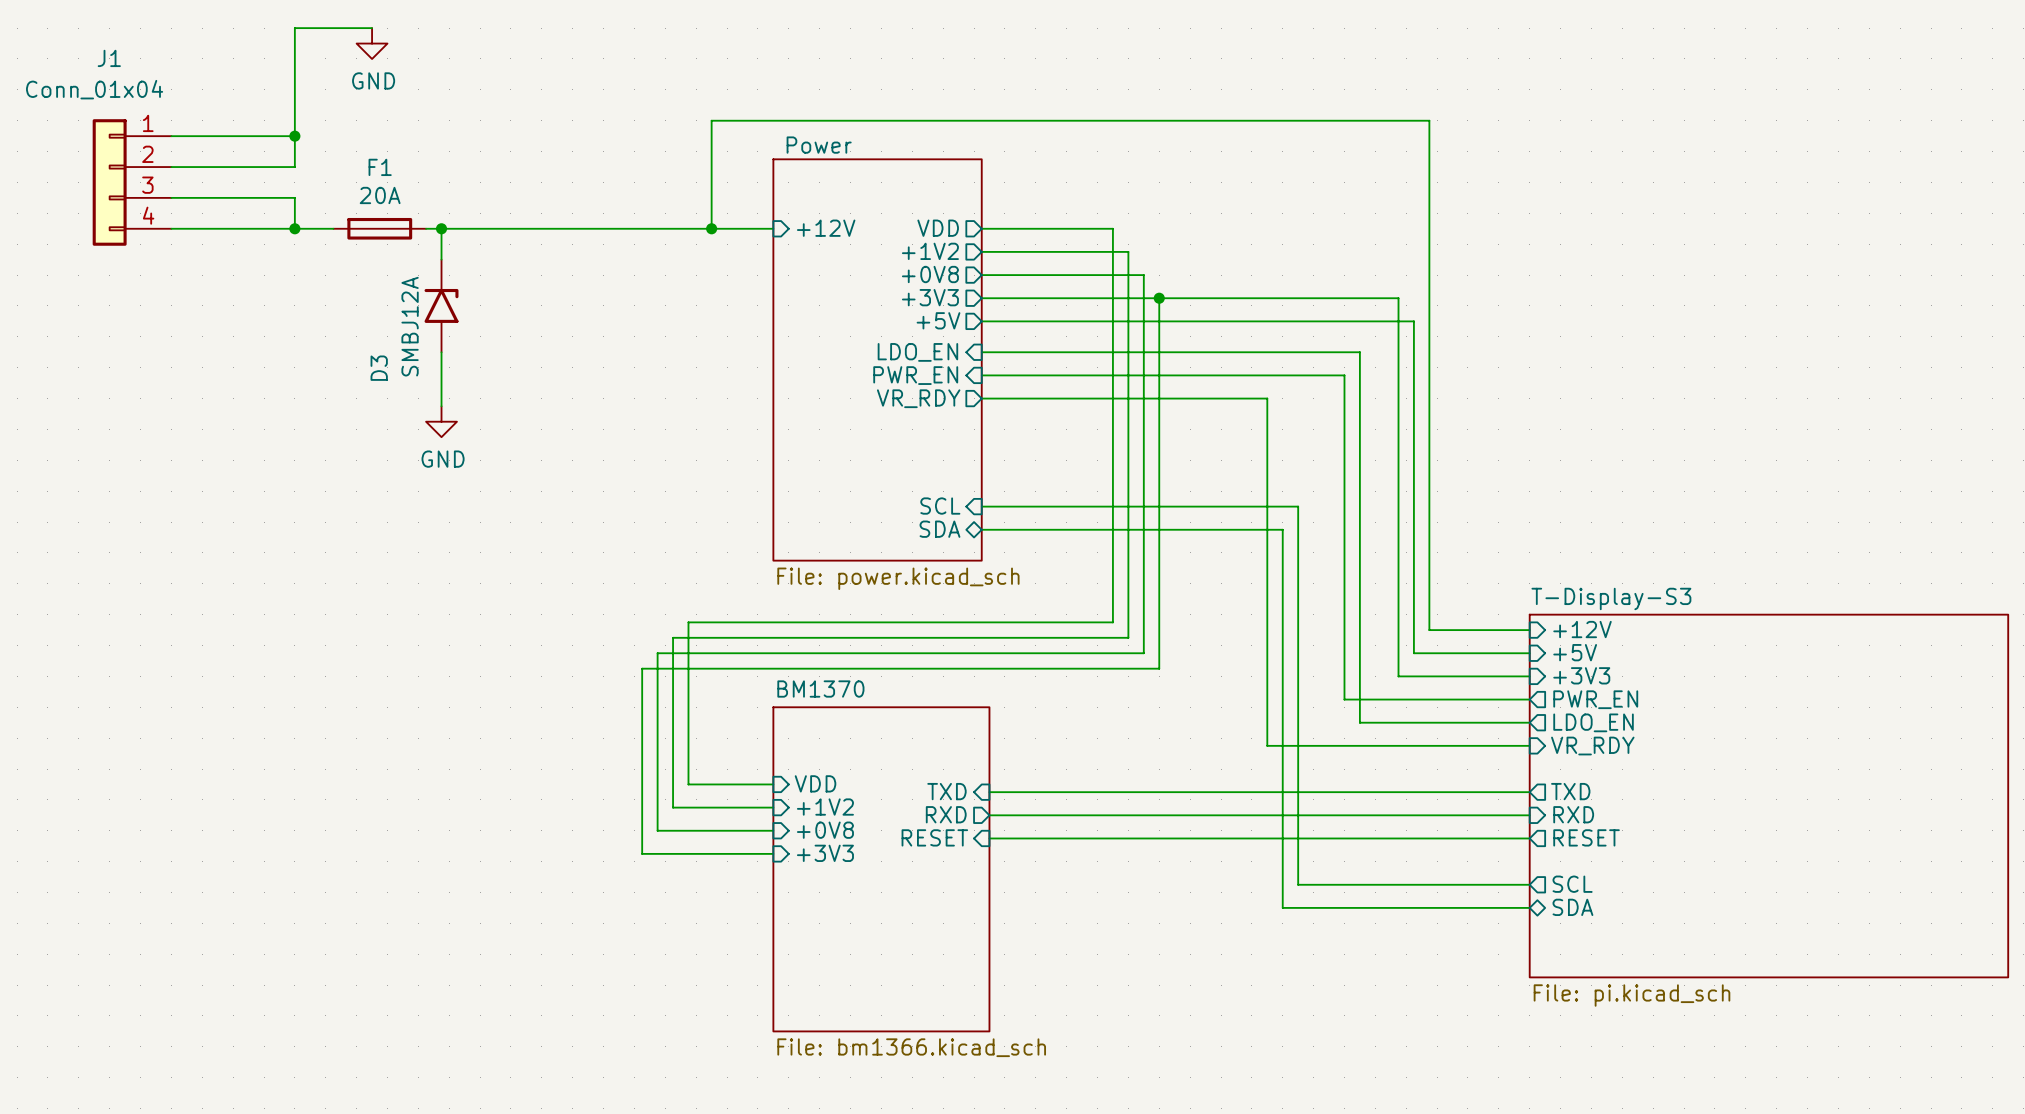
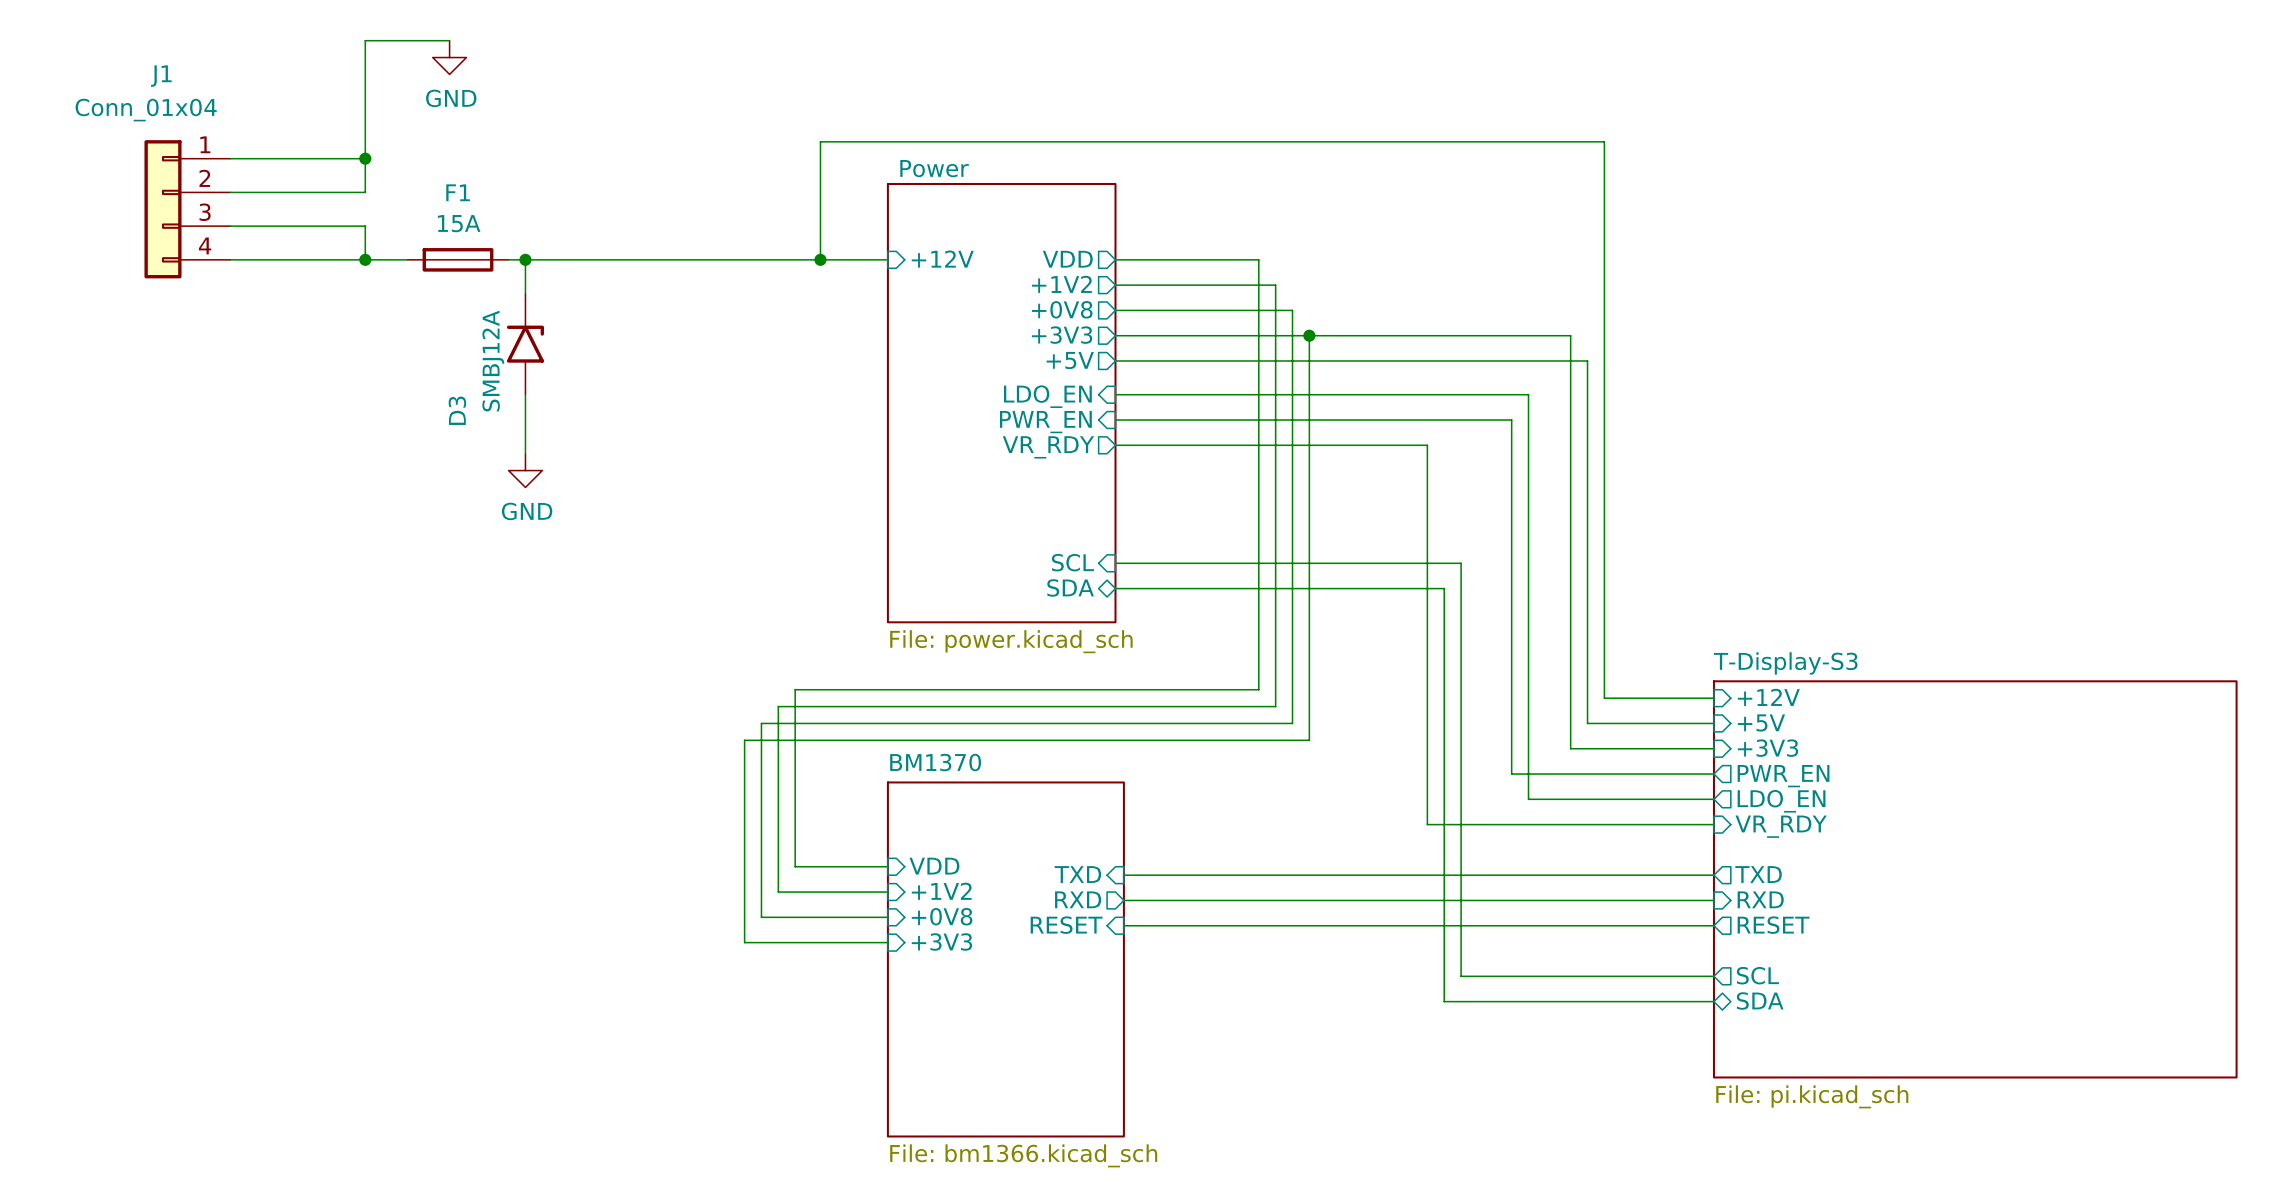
F1 value: 20A (380, 195) -> 15A (459, 223)

